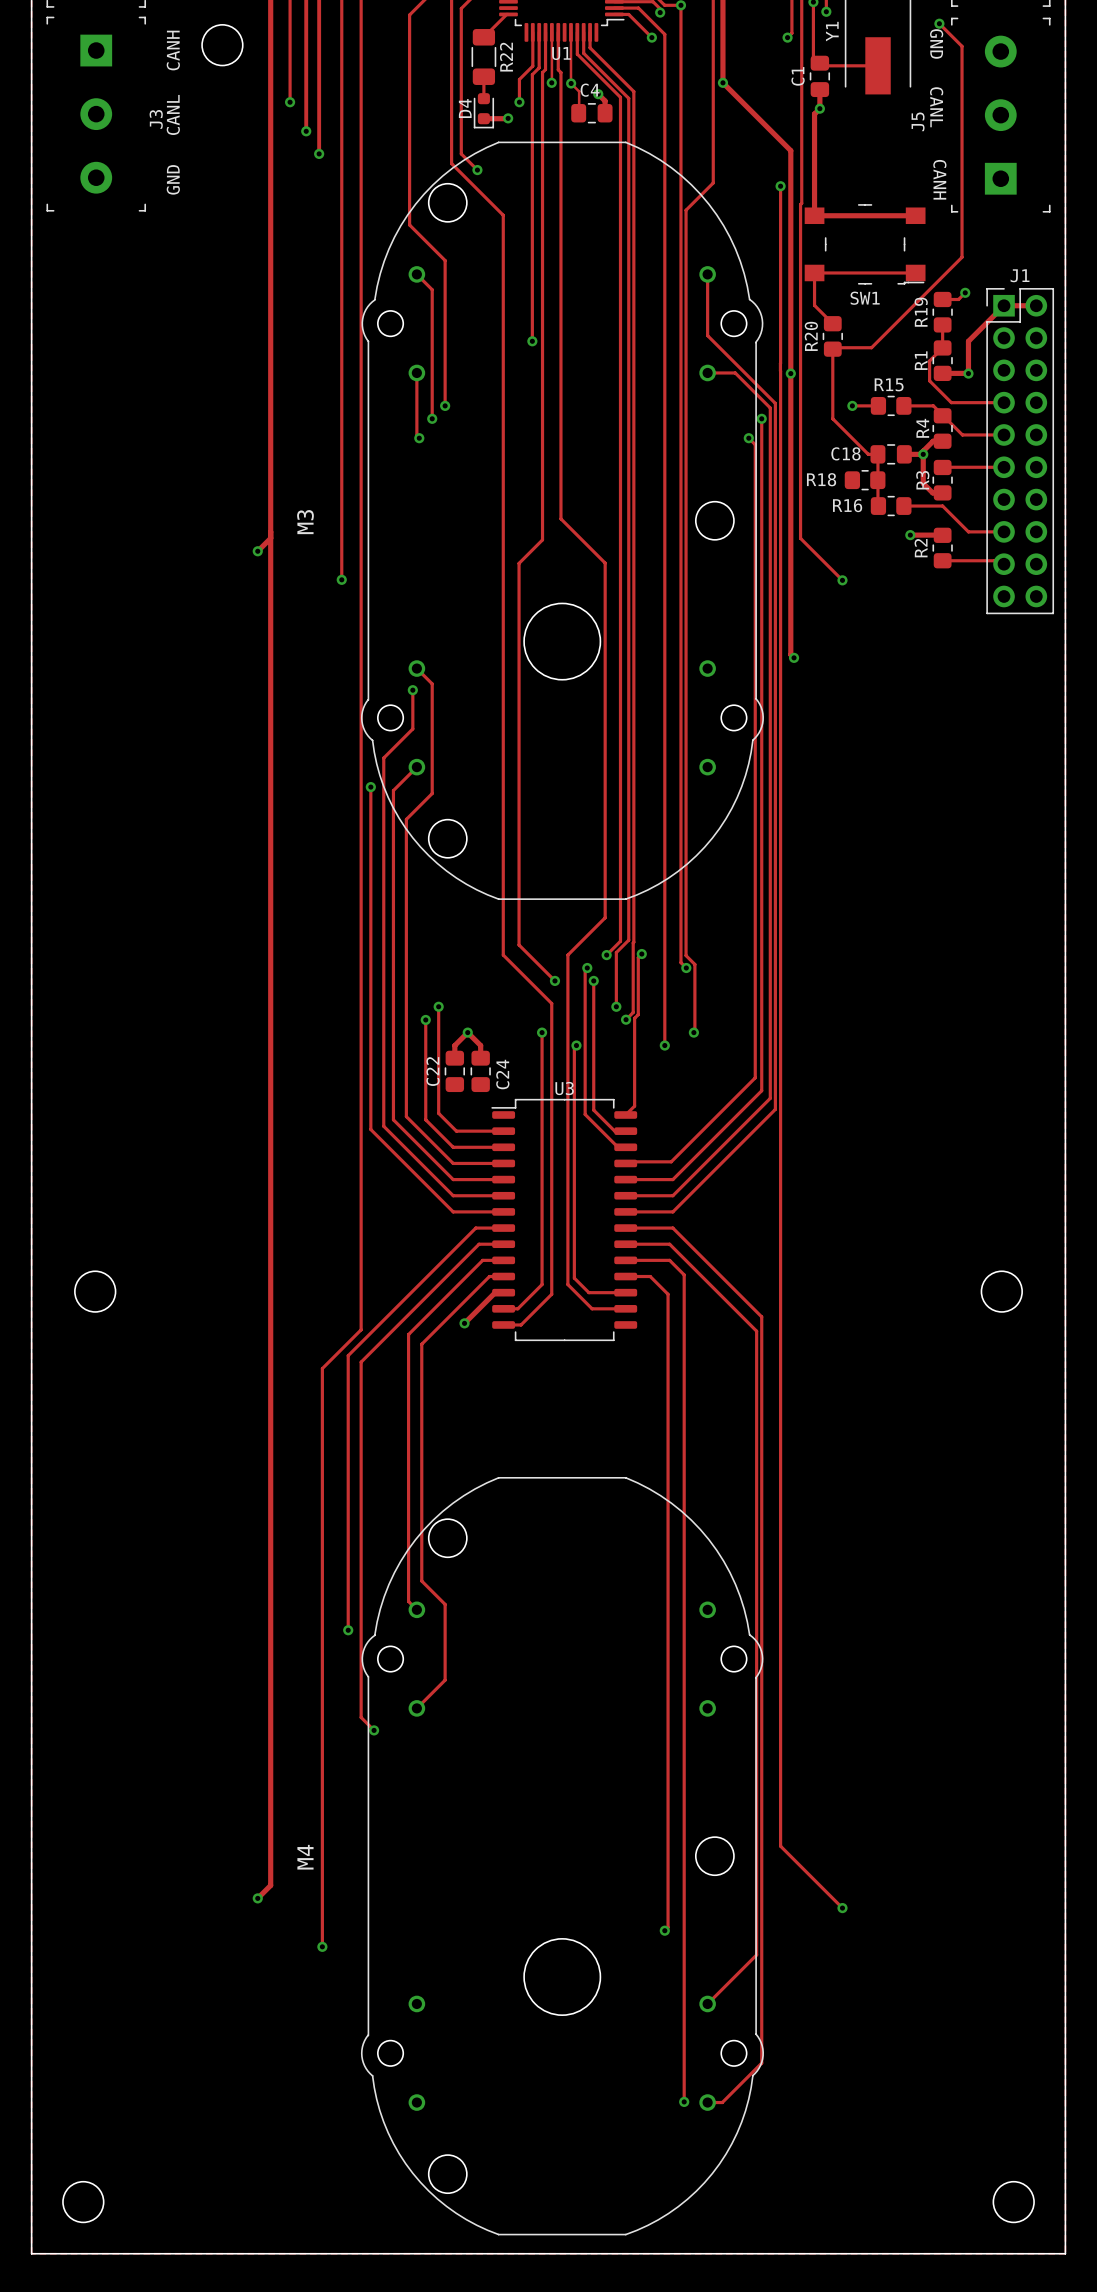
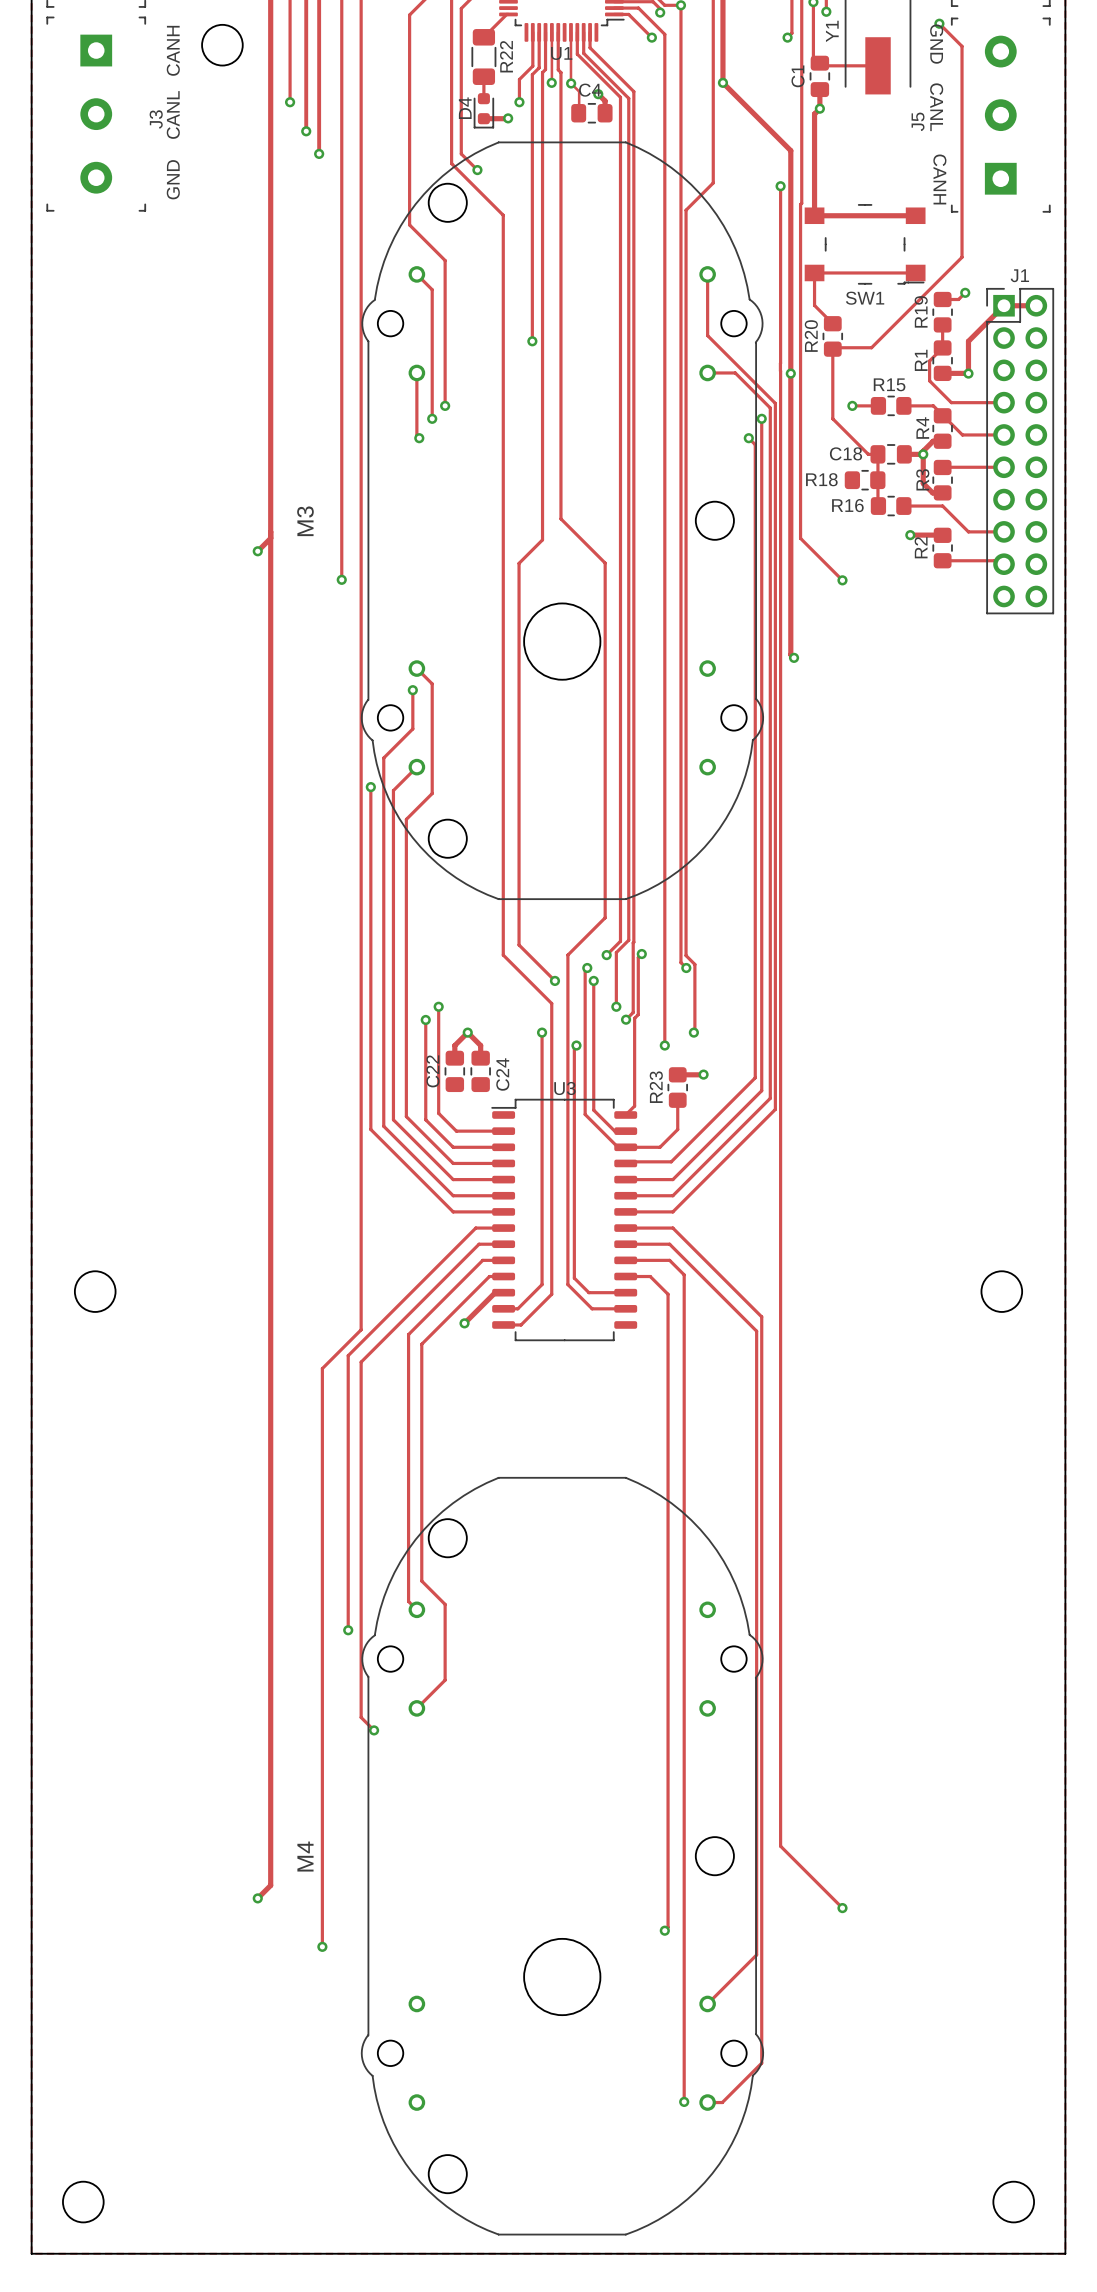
track: none -> (703, 1074) (677, 1074)
via: none -> (703, 1074)
R23: none -> (677, 1087)
track: none -> (677, 1100) (677, 1129) (659, 1147) (625, 1147)

